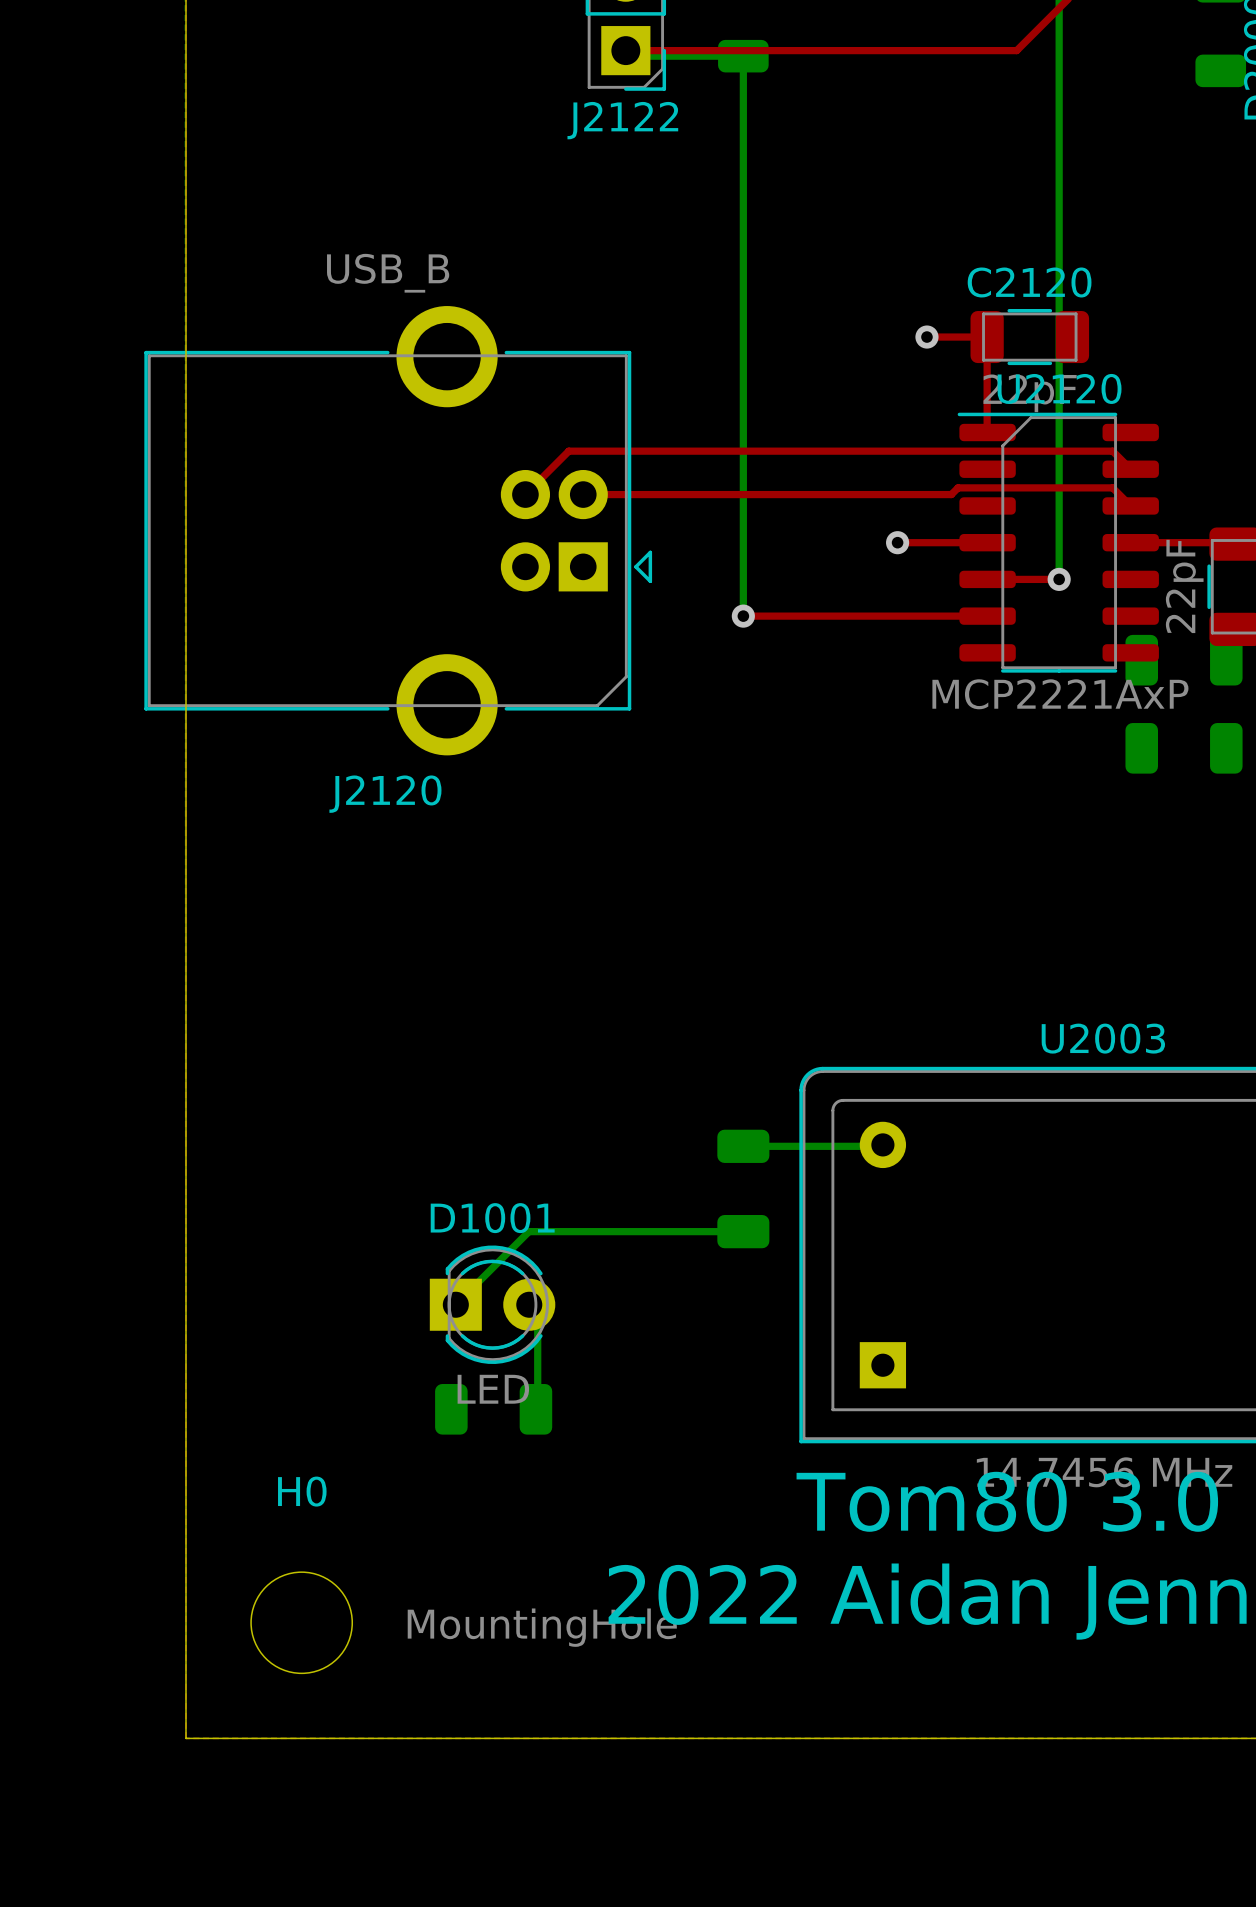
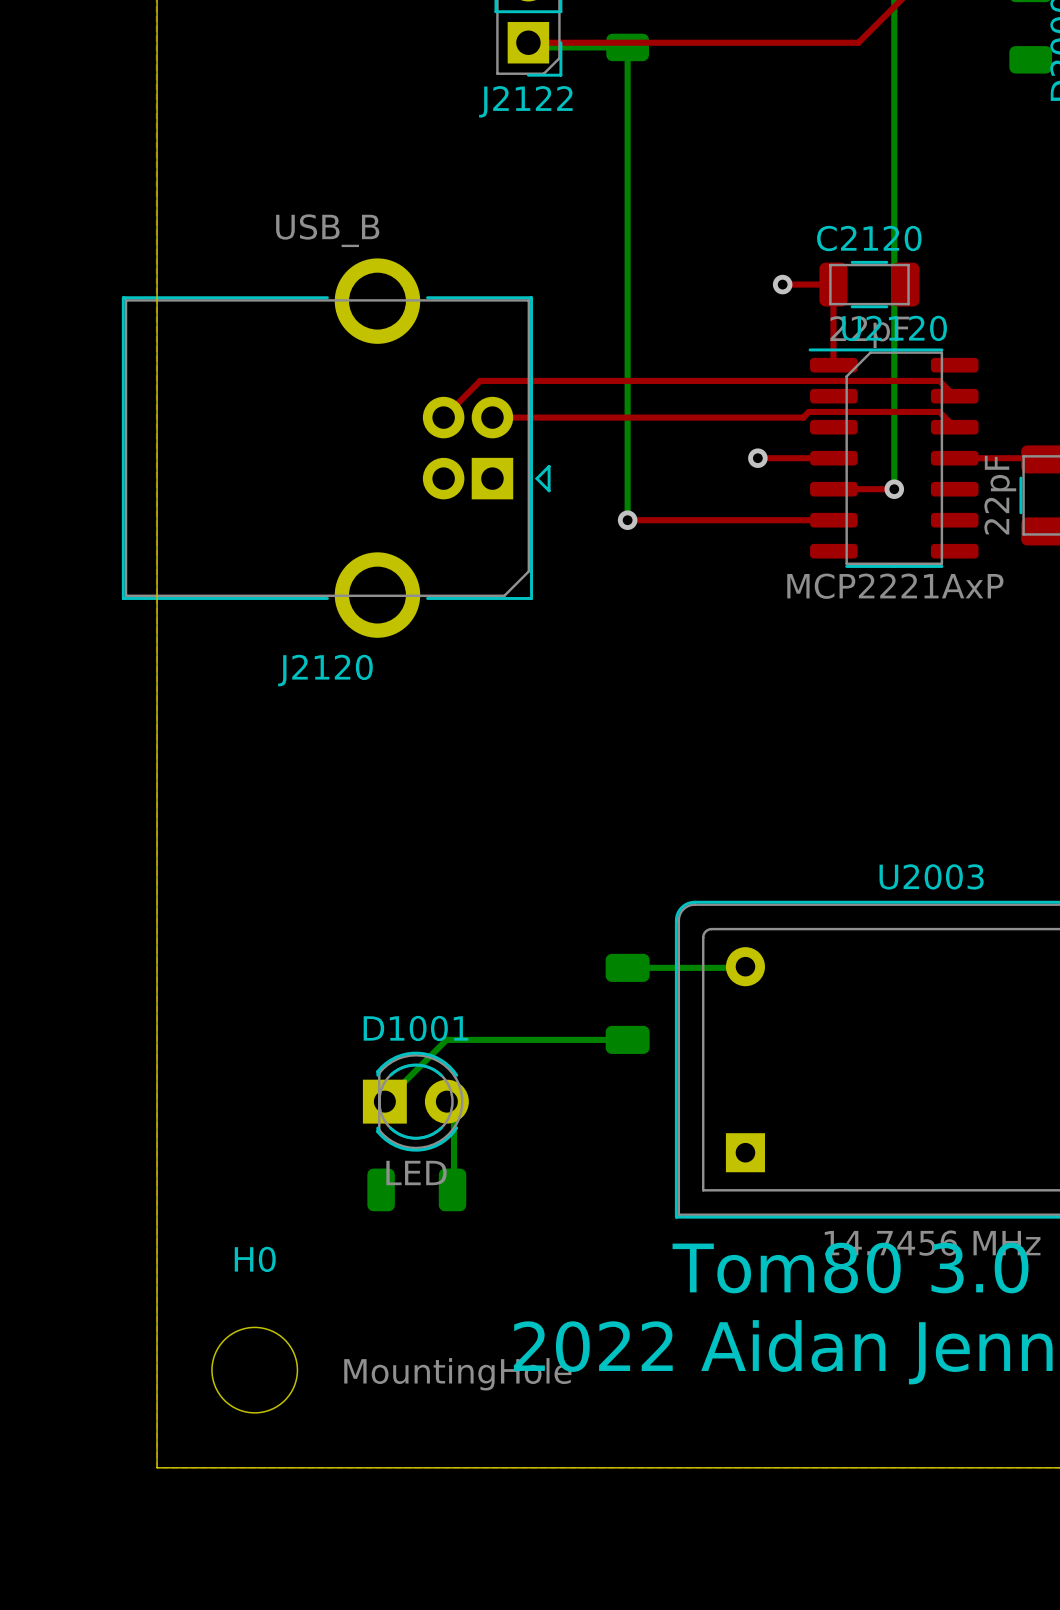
part: (1184, 660) -> none
part: (1184, 748) -> none

